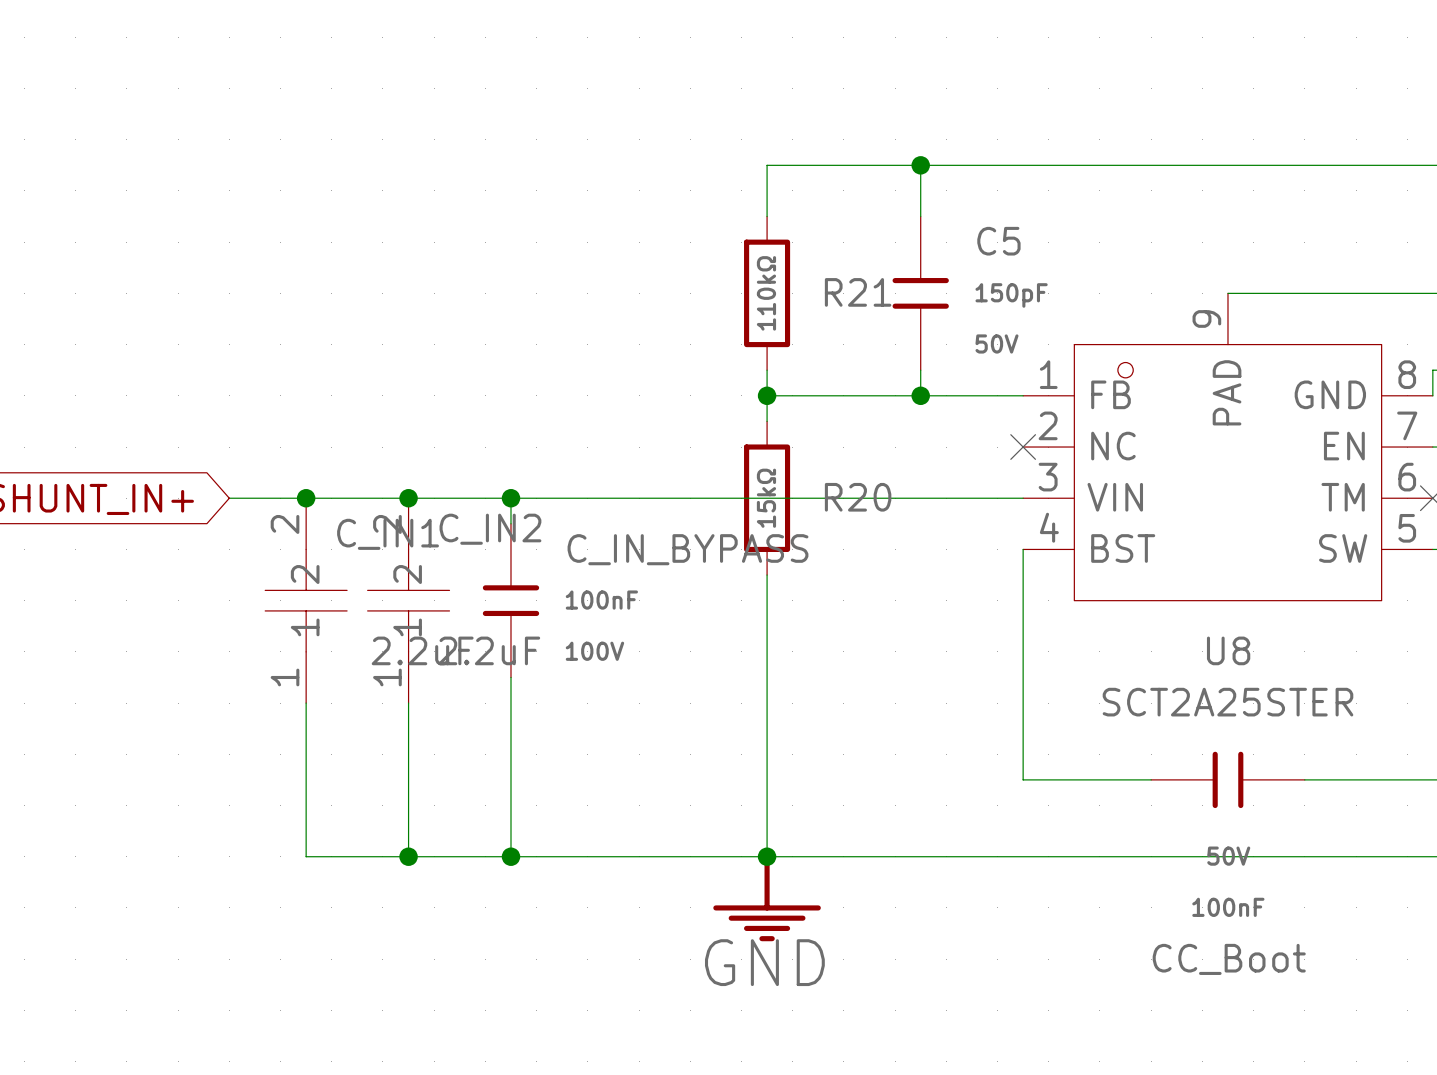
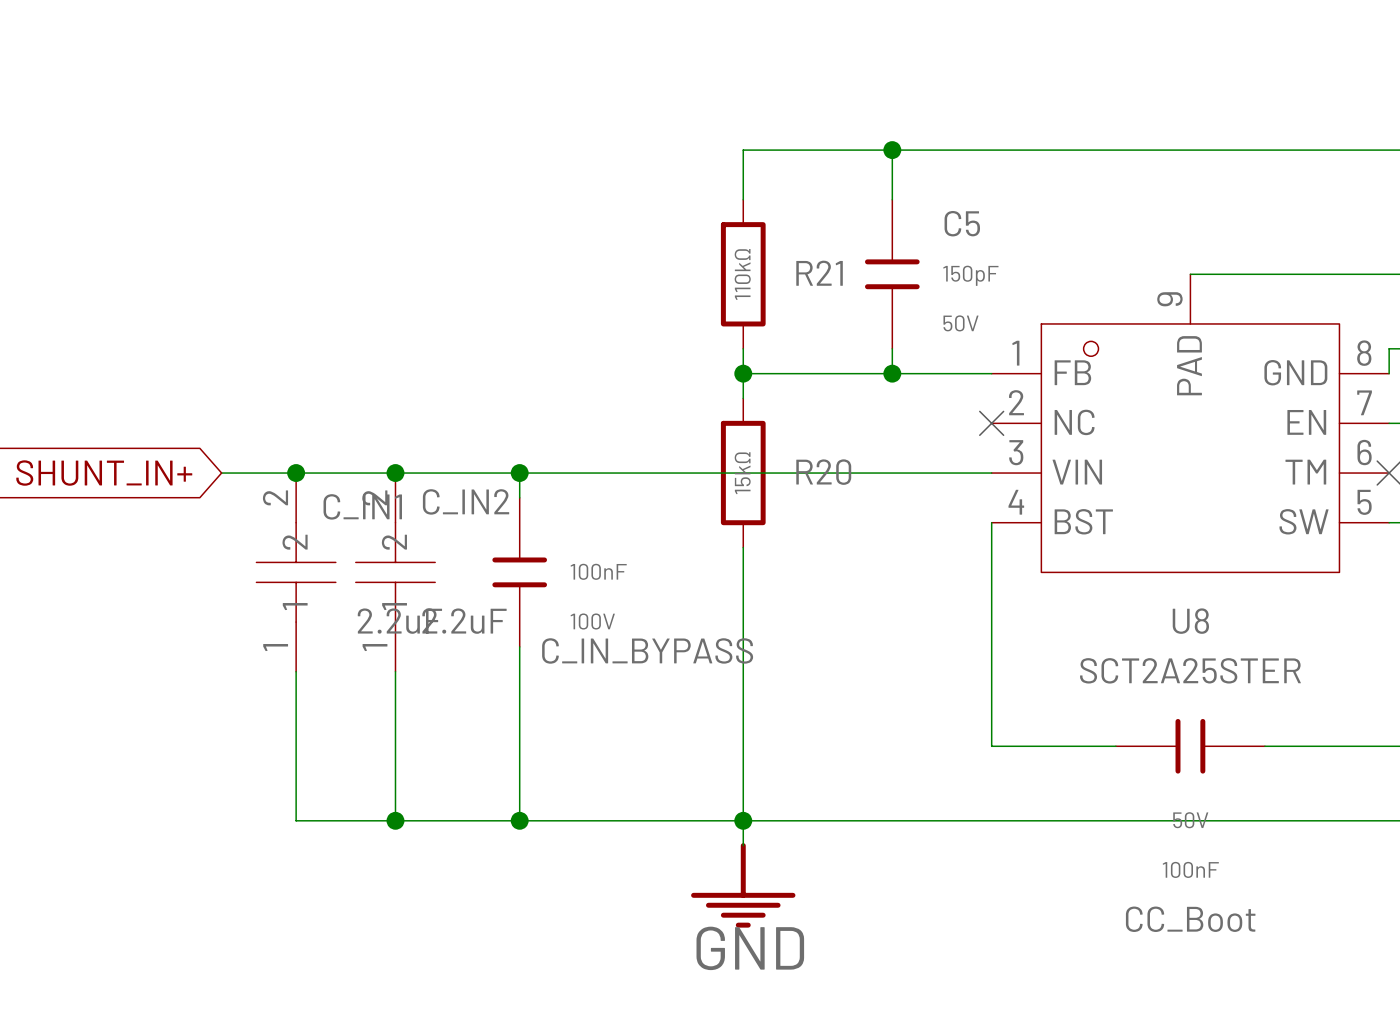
wire: (510, 498) (510, 523) -> (519, 473) (519, 497)
junction position: (510, 498) -> (519, 473)
C_IN_BYPASS name position: C_IN_BYPASS (688, 549) -> C_IN_BYPASS (647, 650)
C_IN_BYPASS position: (510, 600) -> (519, 572)
wire: (510, 677) (510, 856) -> (519, 646) (519, 820)
junction position: (510, 856) -> (519, 820)
power symbol position: GND (767, 897) -> GND (743, 885)

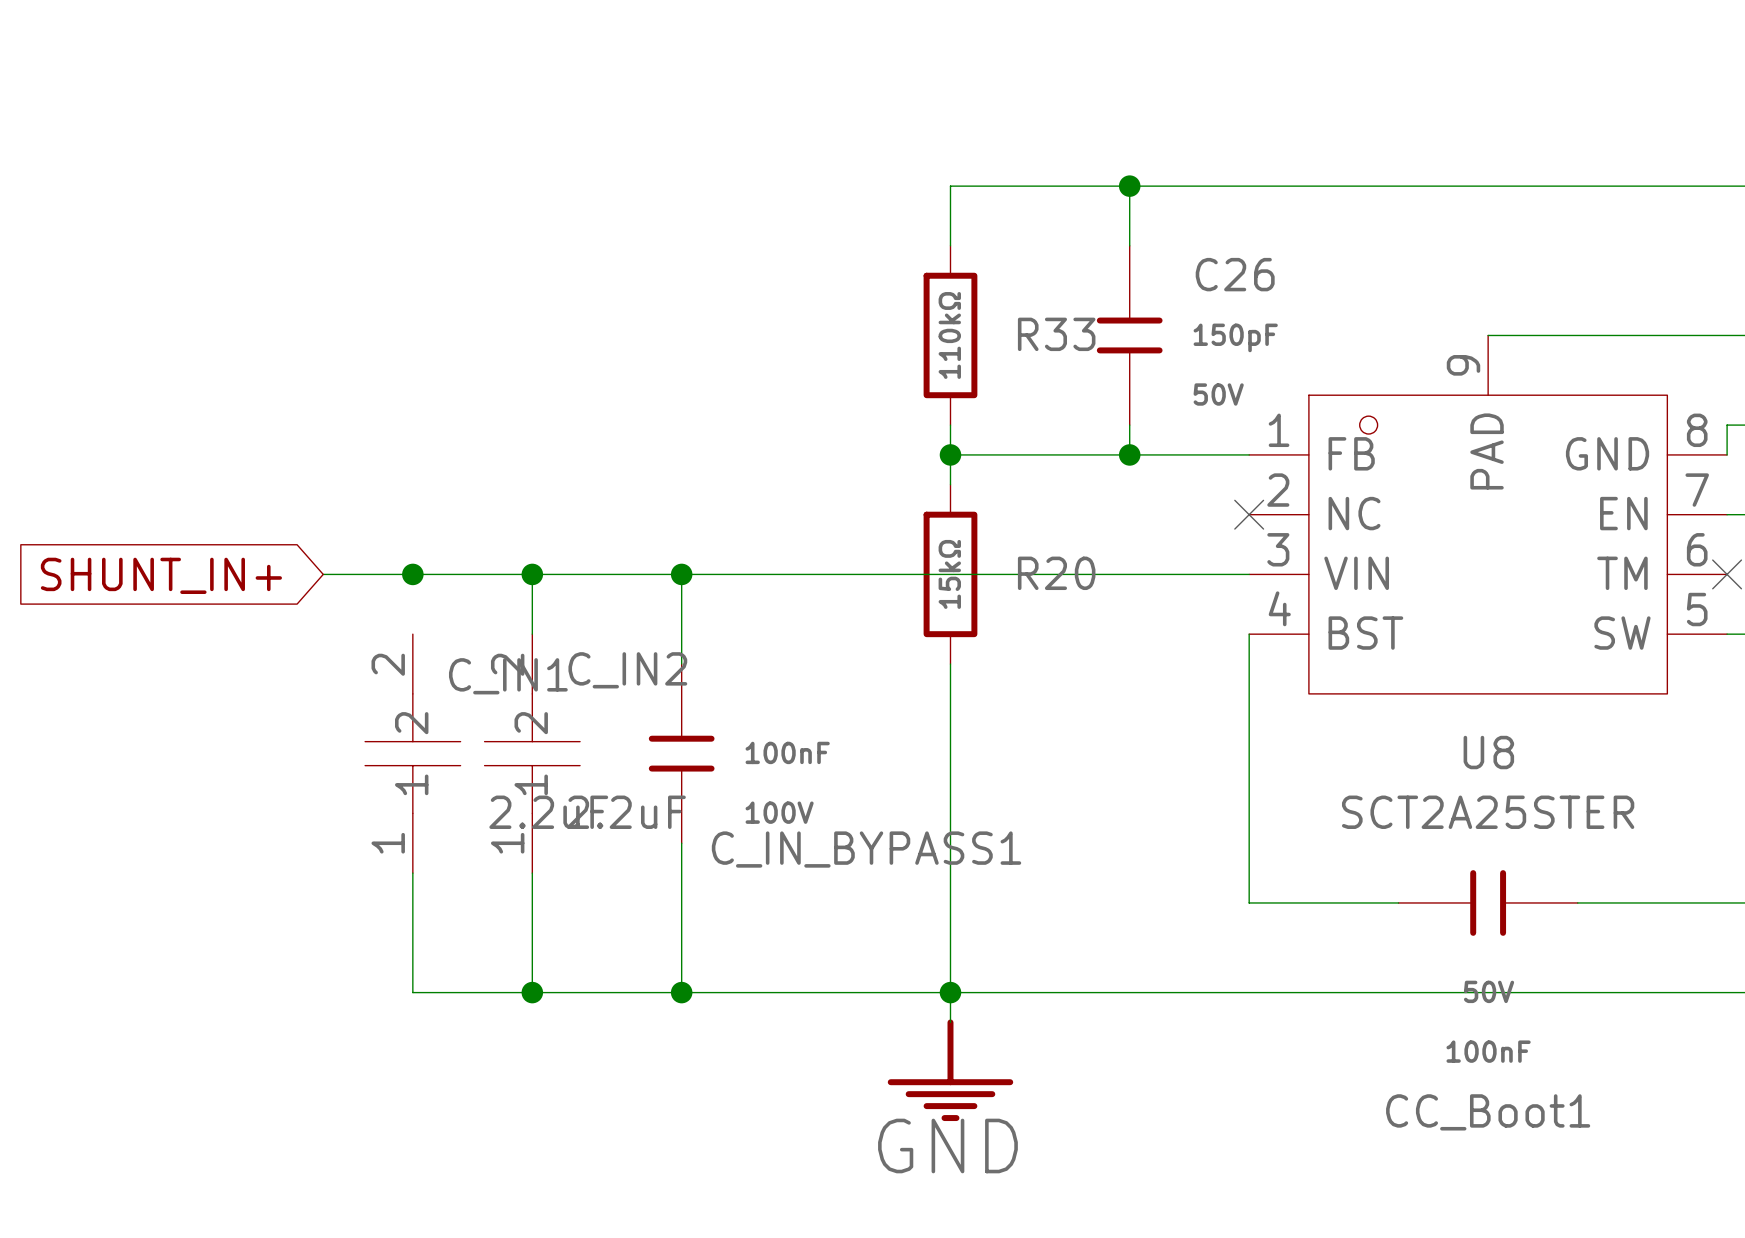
C5 name: C5 (962, 223) -> C26 (1235, 274)
R21 name: R21 (819, 273) -> R33 (1056, 334)
C_IN1 position: (296, 572) -> (412, 753)
C_IN2 position: (395, 572) -> (532, 753)
C_IN_BYPASS: 100nF (519, 572) -> none
C_IN_BYPASS1: none -> 100nF (681, 753)
CC_Boot name: CC_Boot (1190, 919) -> CC_Boot1 (1488, 1112)

